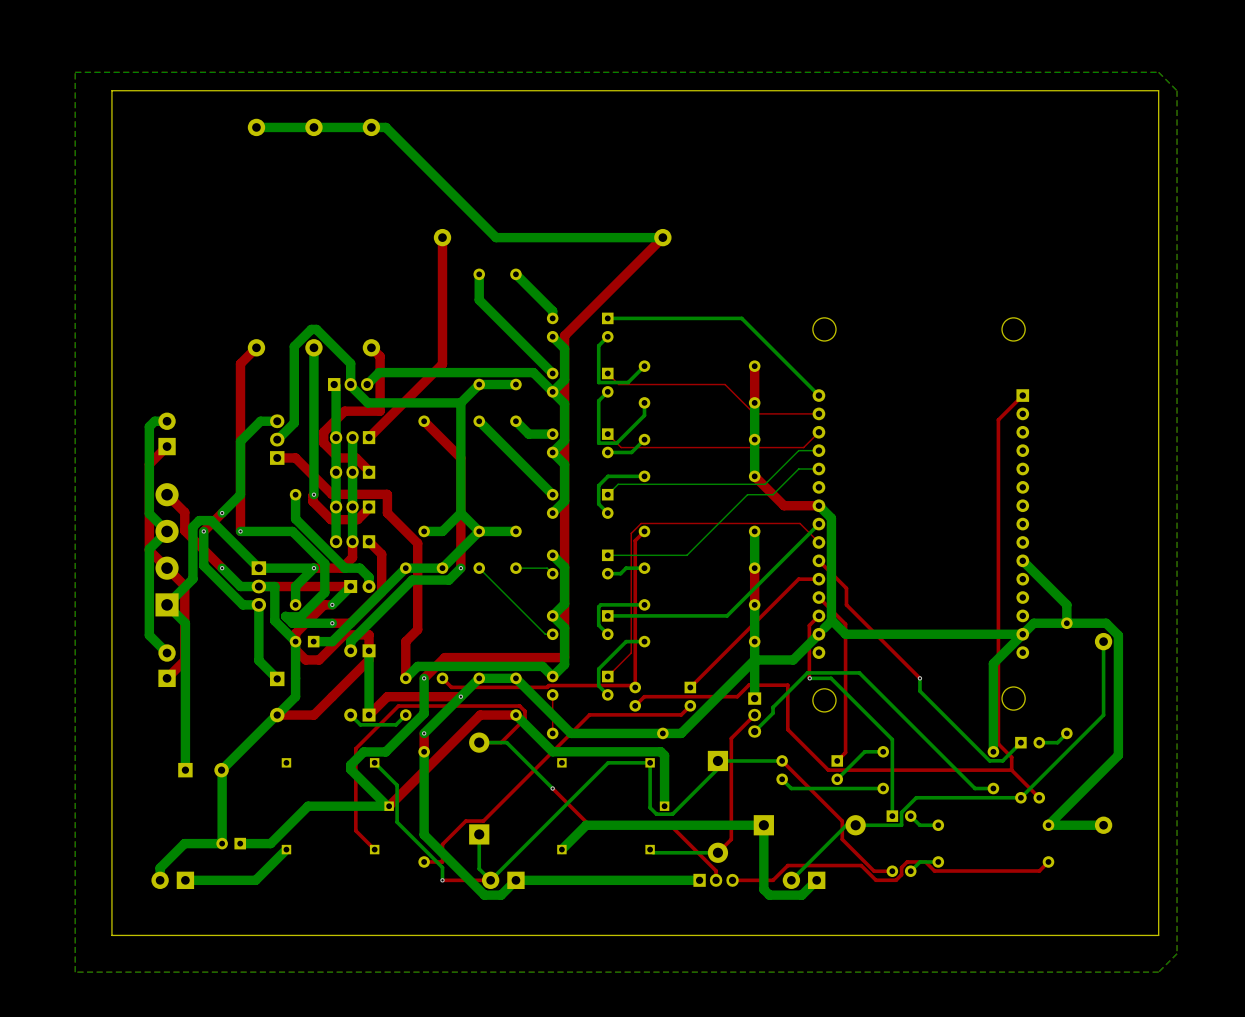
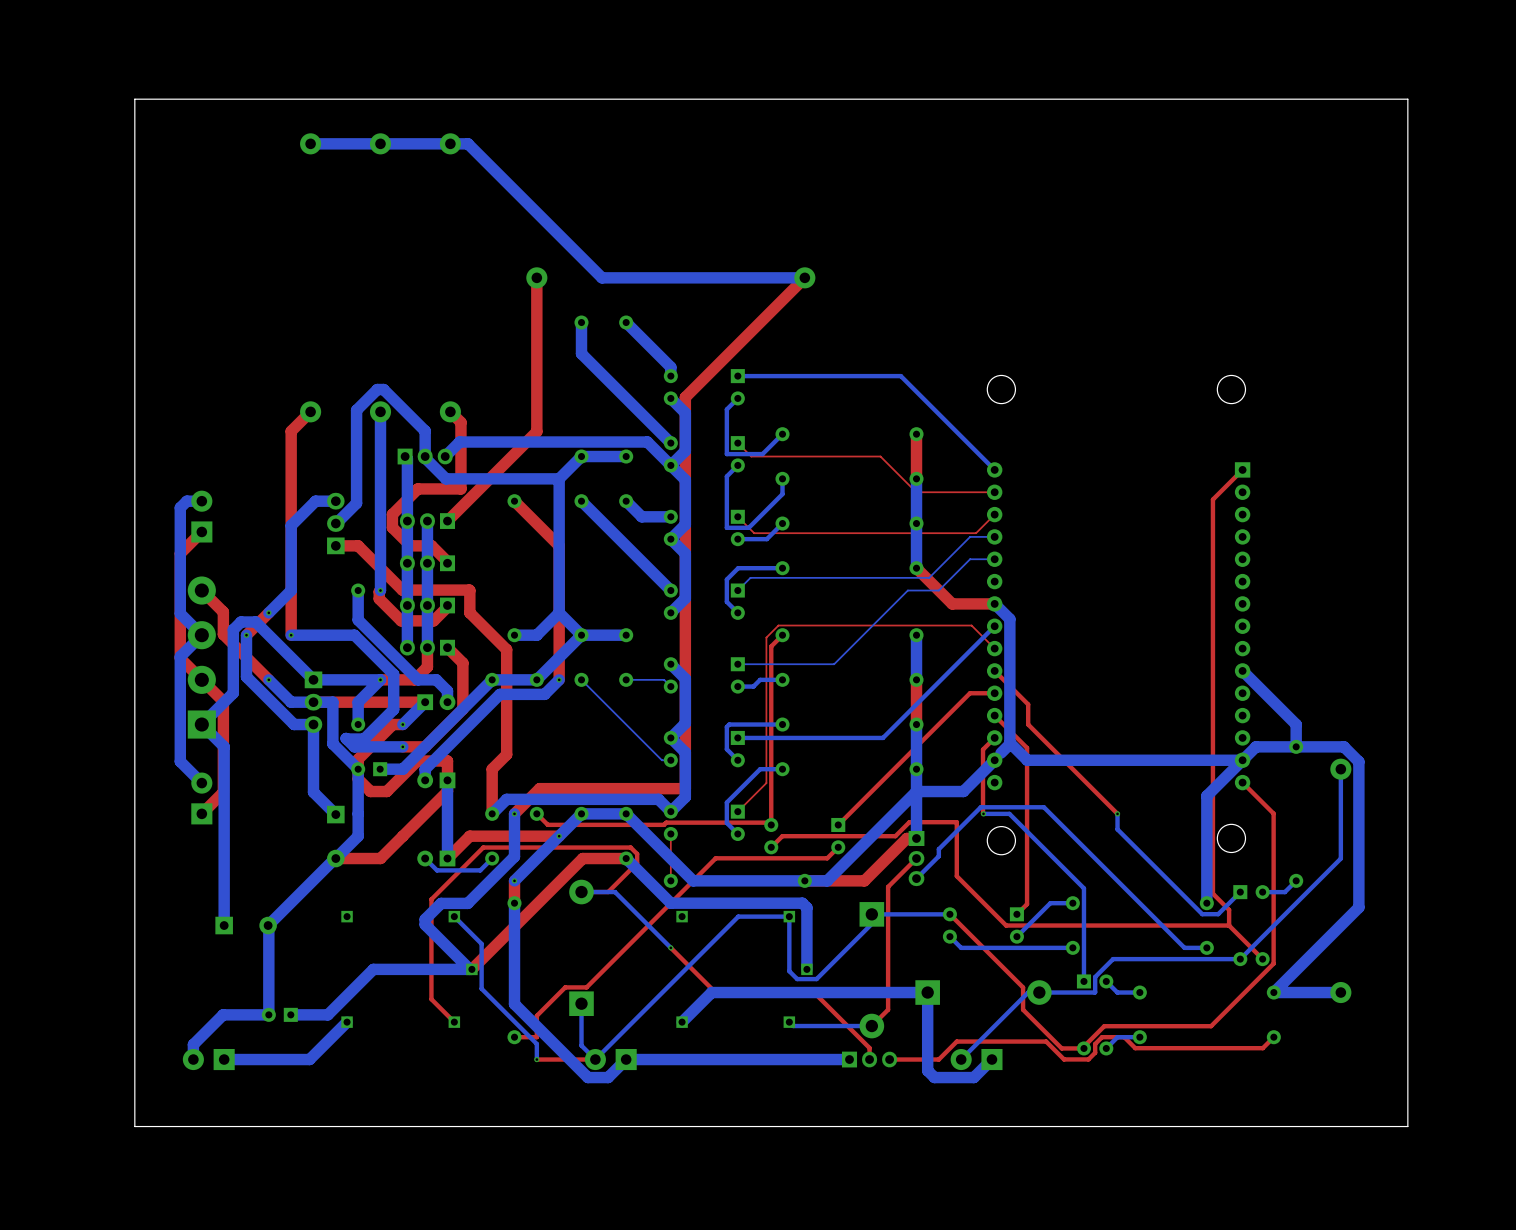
bottom zone outline: (1158, 72) (75, 72) (75, 972) (1158, 972) (1177, 953) (1177, 90) (1158, 72) -> none
top track: none -> (1242, 782) (1273, 813) (1273, 963) (1211, 1026) (1104, 1026) (1083, 1048)
top track: none -> (916, 838) (906, 838) (864, 880) (804, 880)

